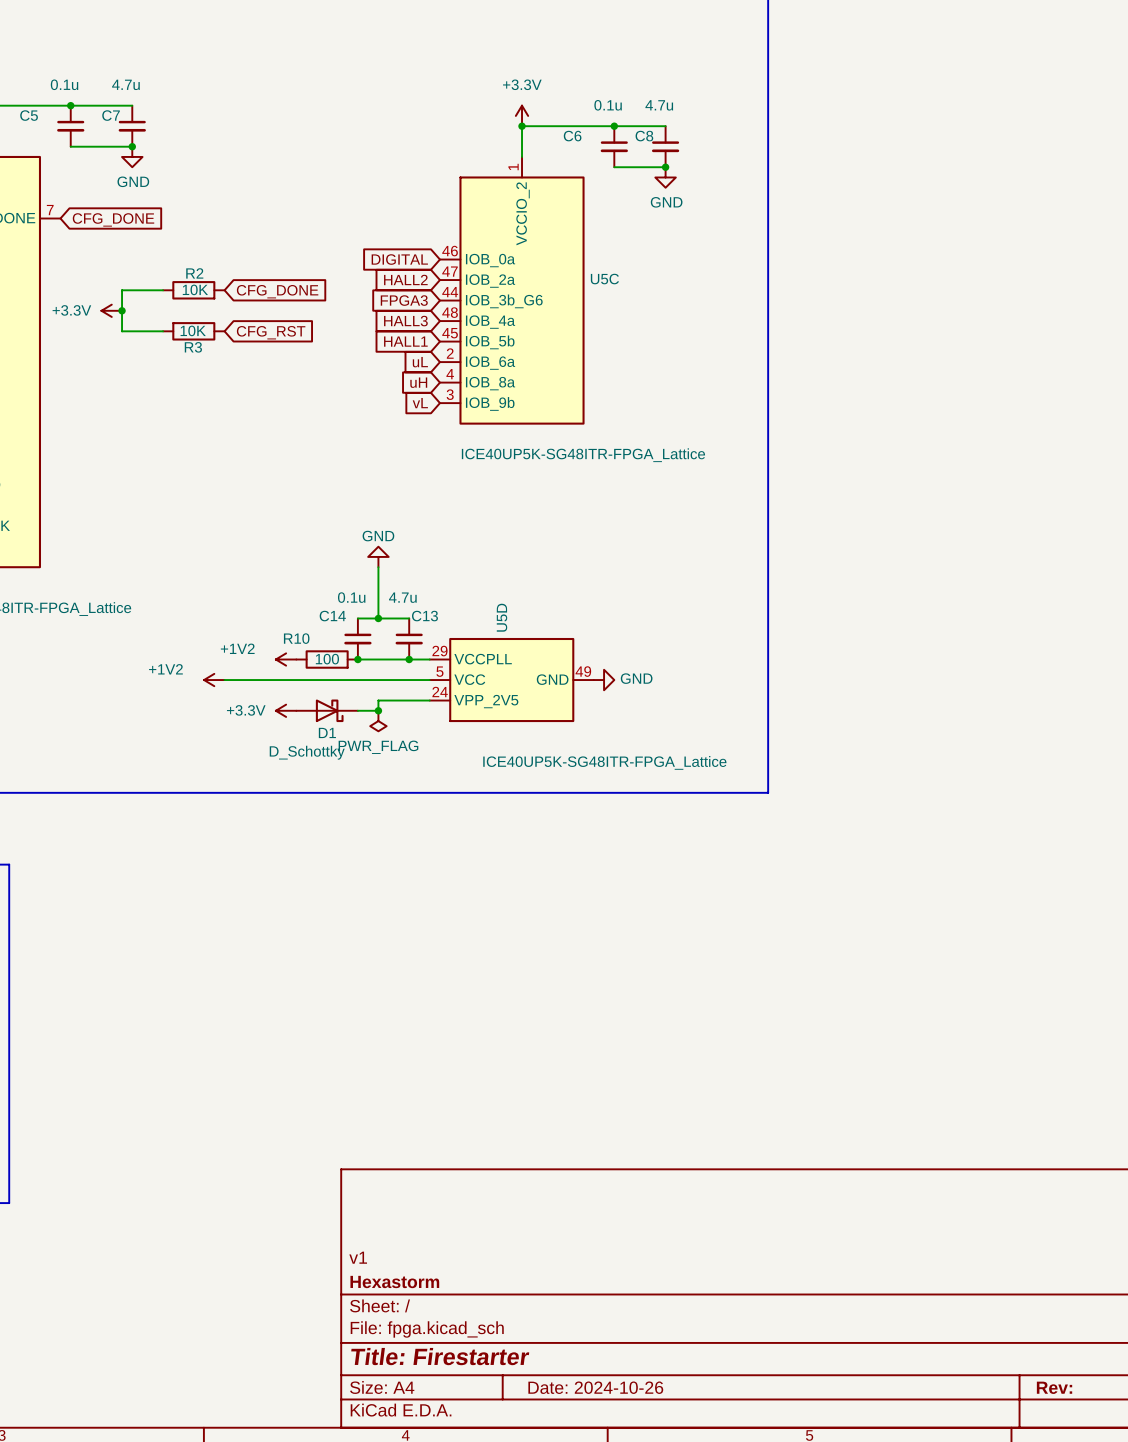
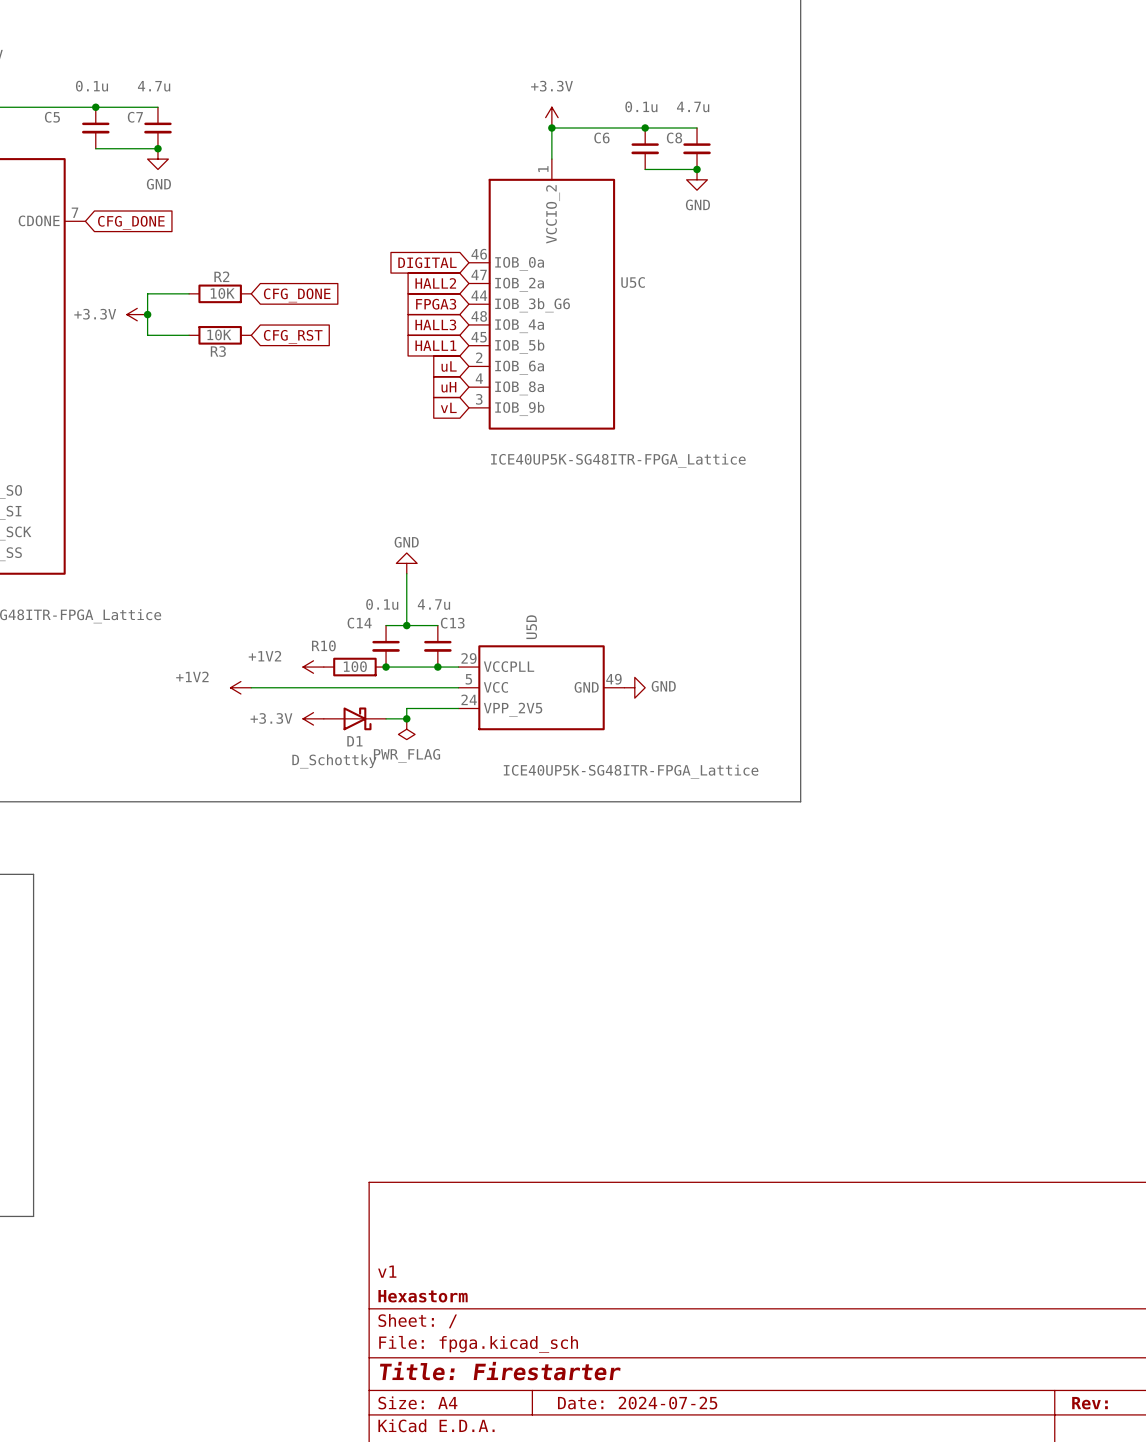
title block: Date: 2024-10-26 (595, 1387) -> Date: 2024-07-25 (637, 1403)

